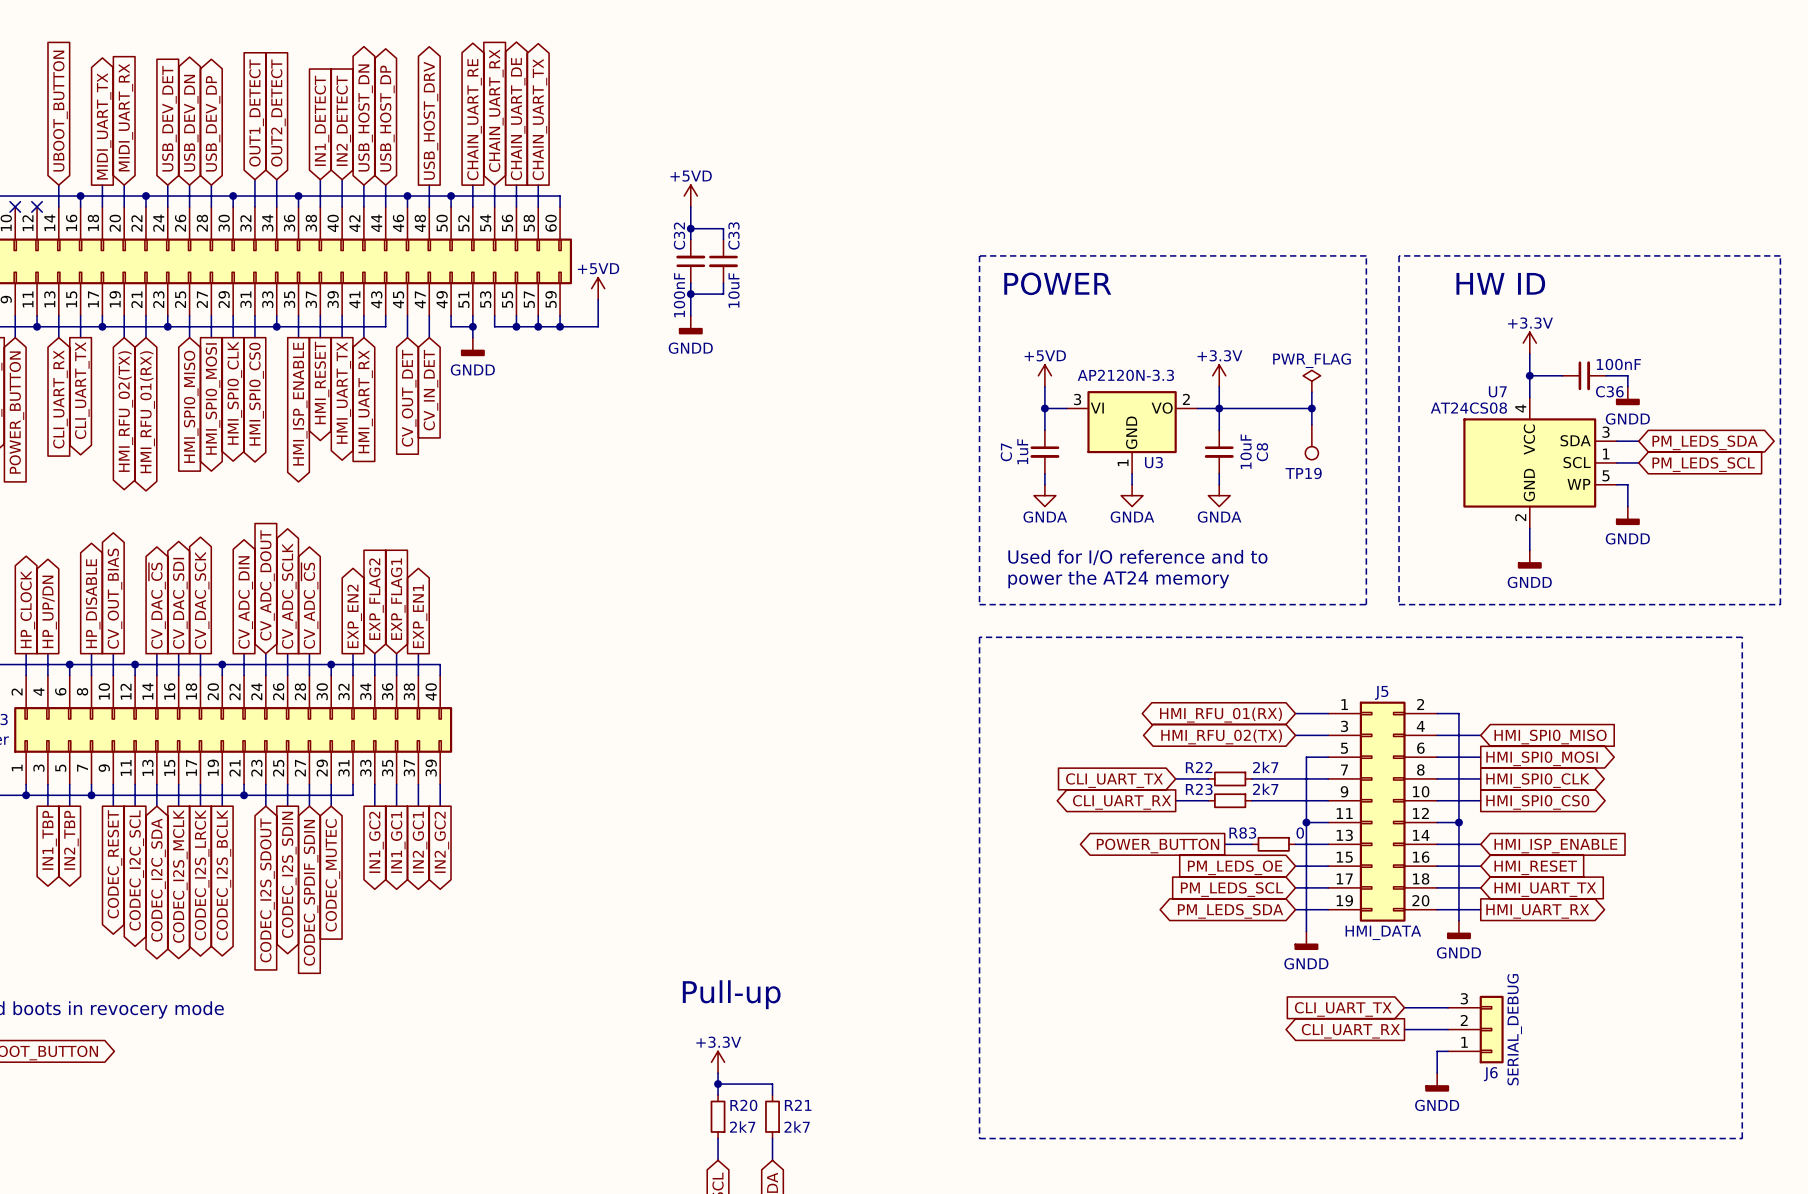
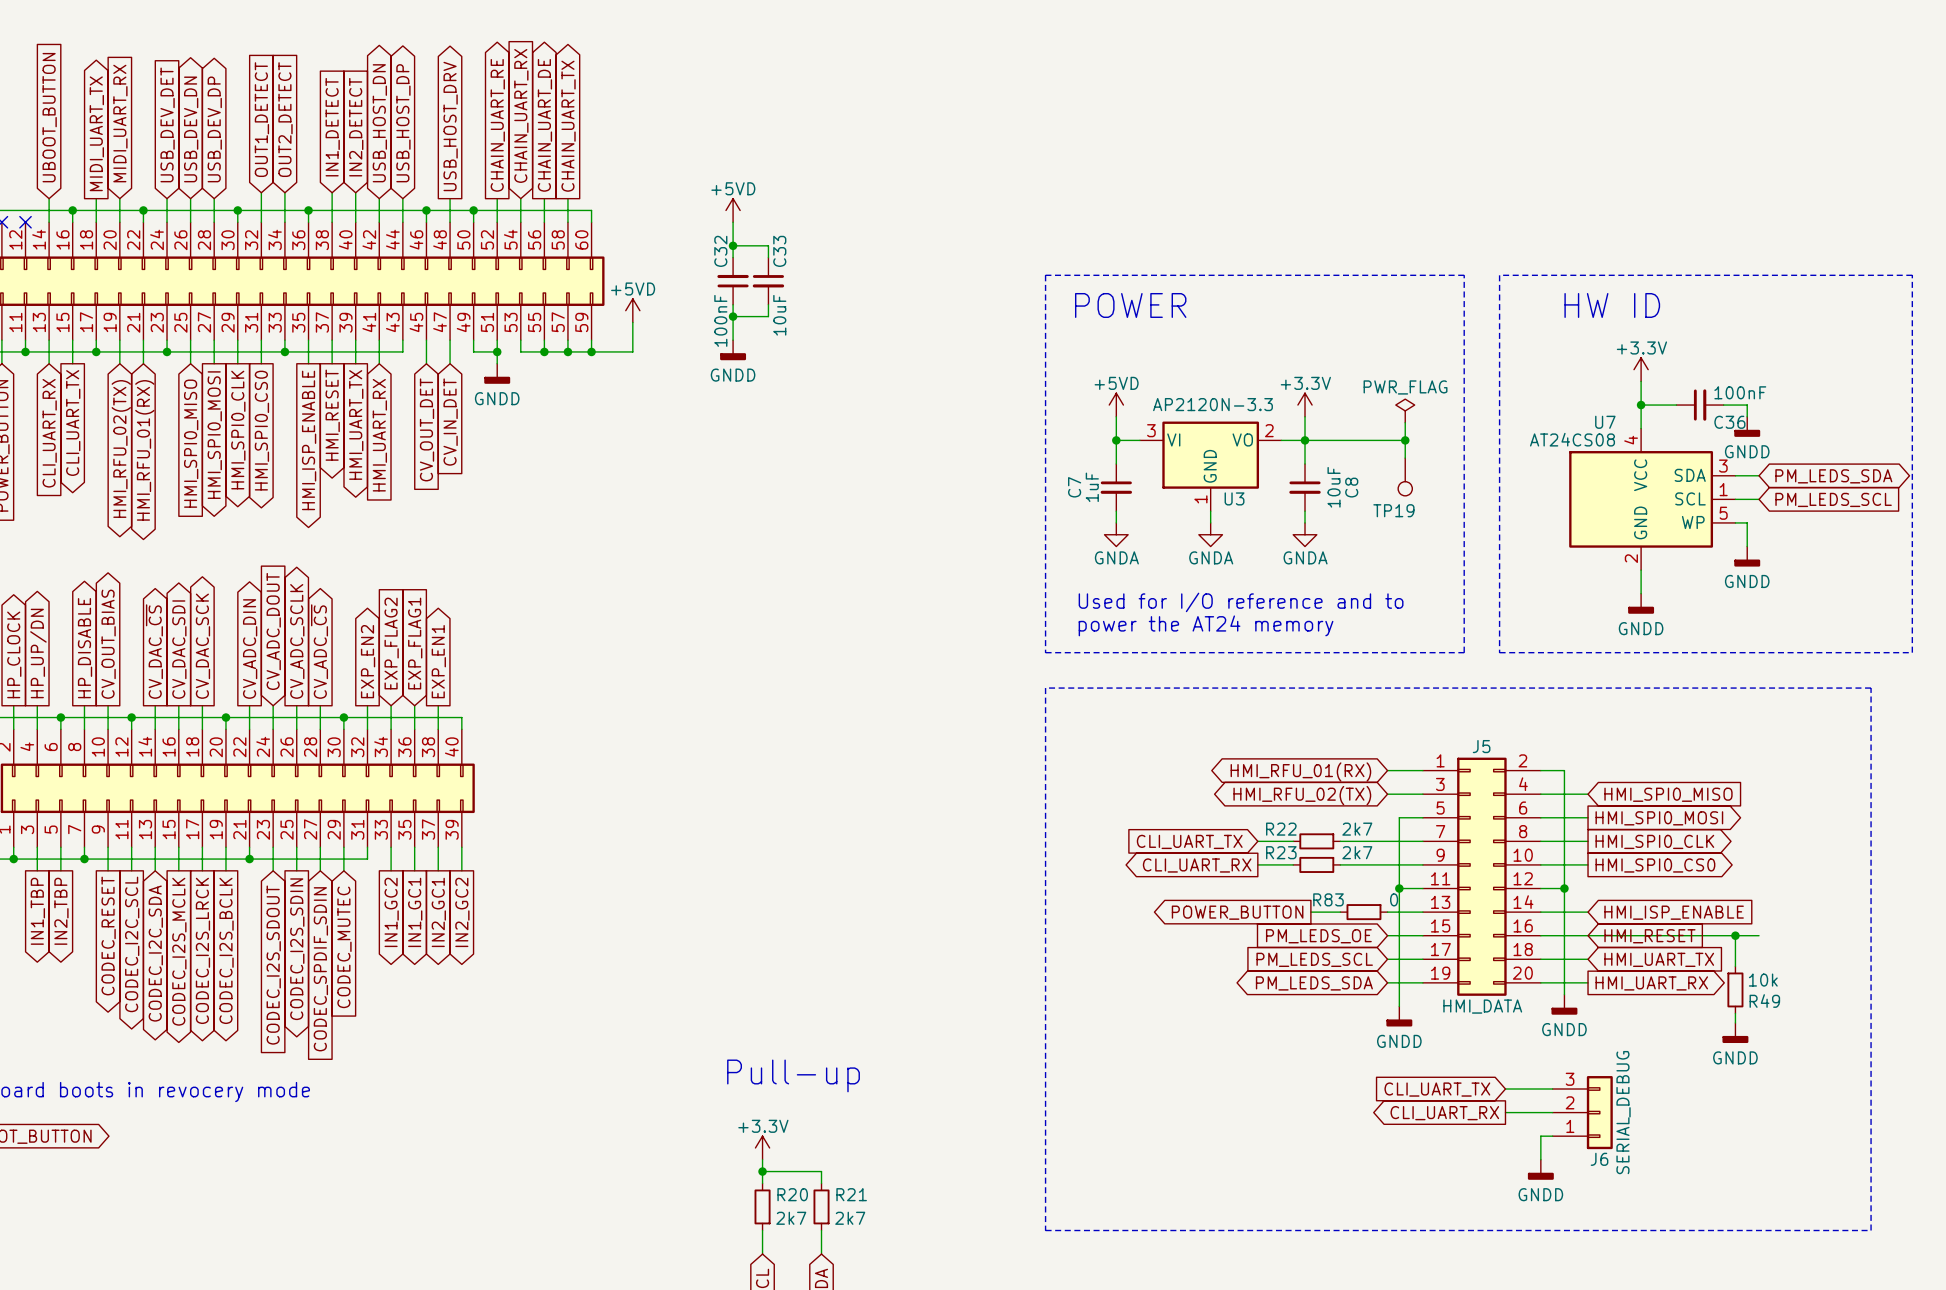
wire: none -> (1588, 935) (1759, 935)
wire: none -> (1735, 935) (1735, 966)
junction: none -> (1735, 935)
R49: none -> 10k (1735, 989)
wire: none -> (1735, 1013) (1735, 1022)
power symbol: none -> GNDD (1735, 1032)

